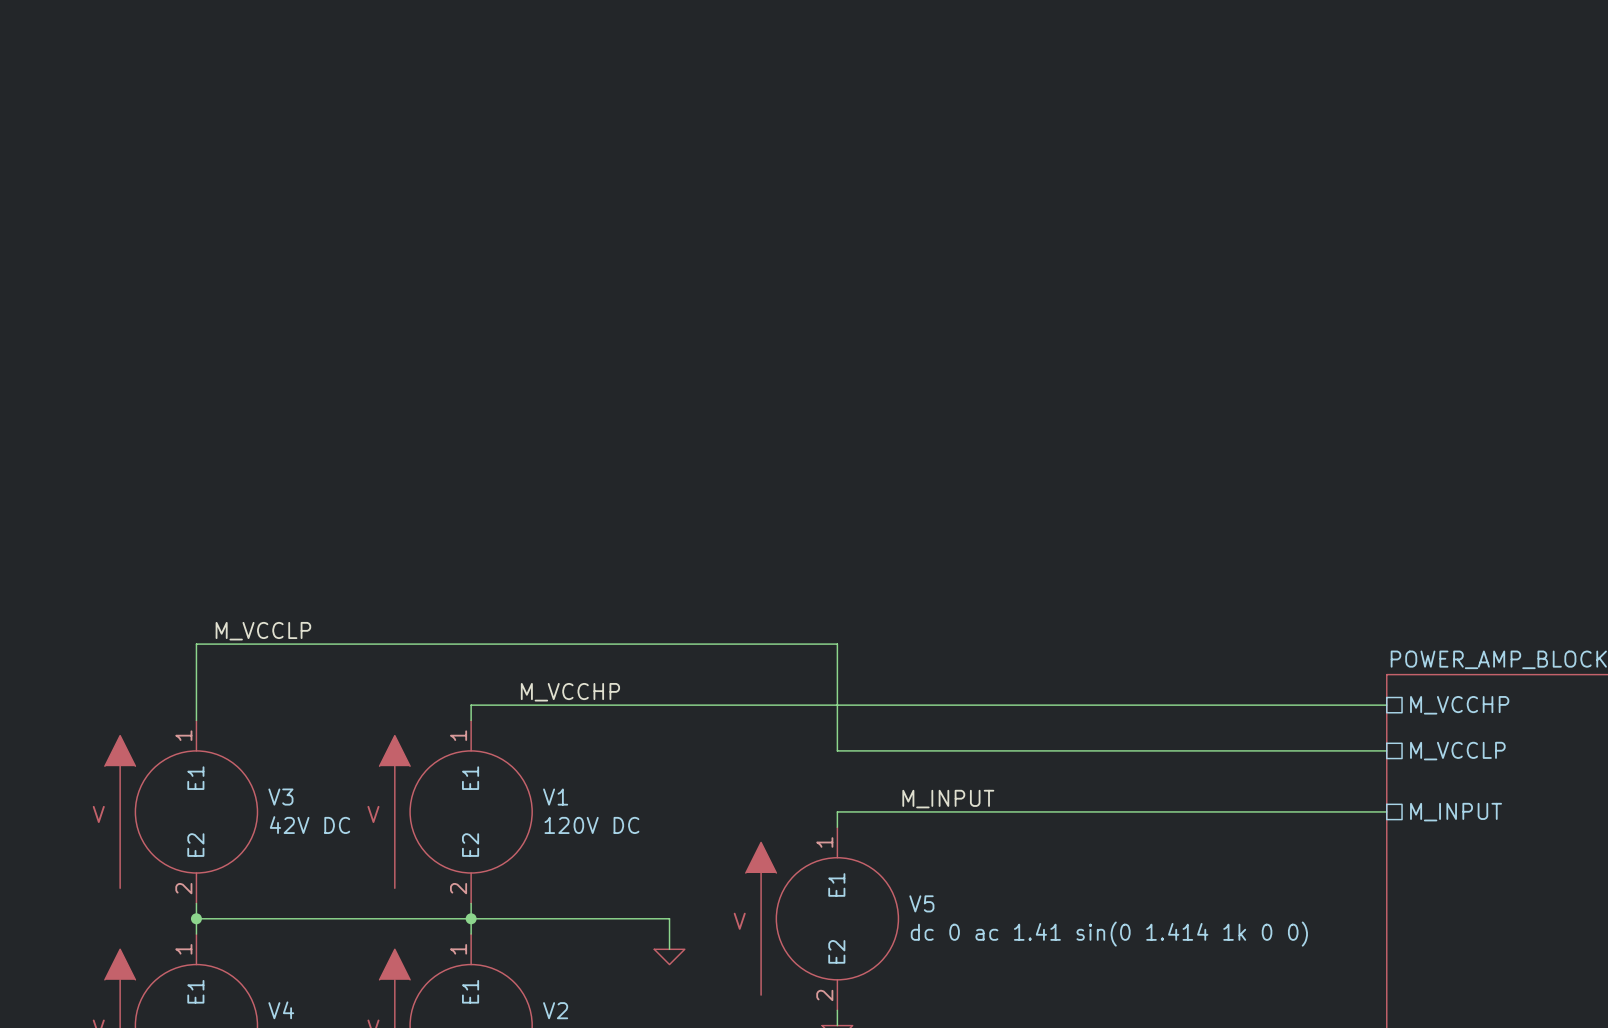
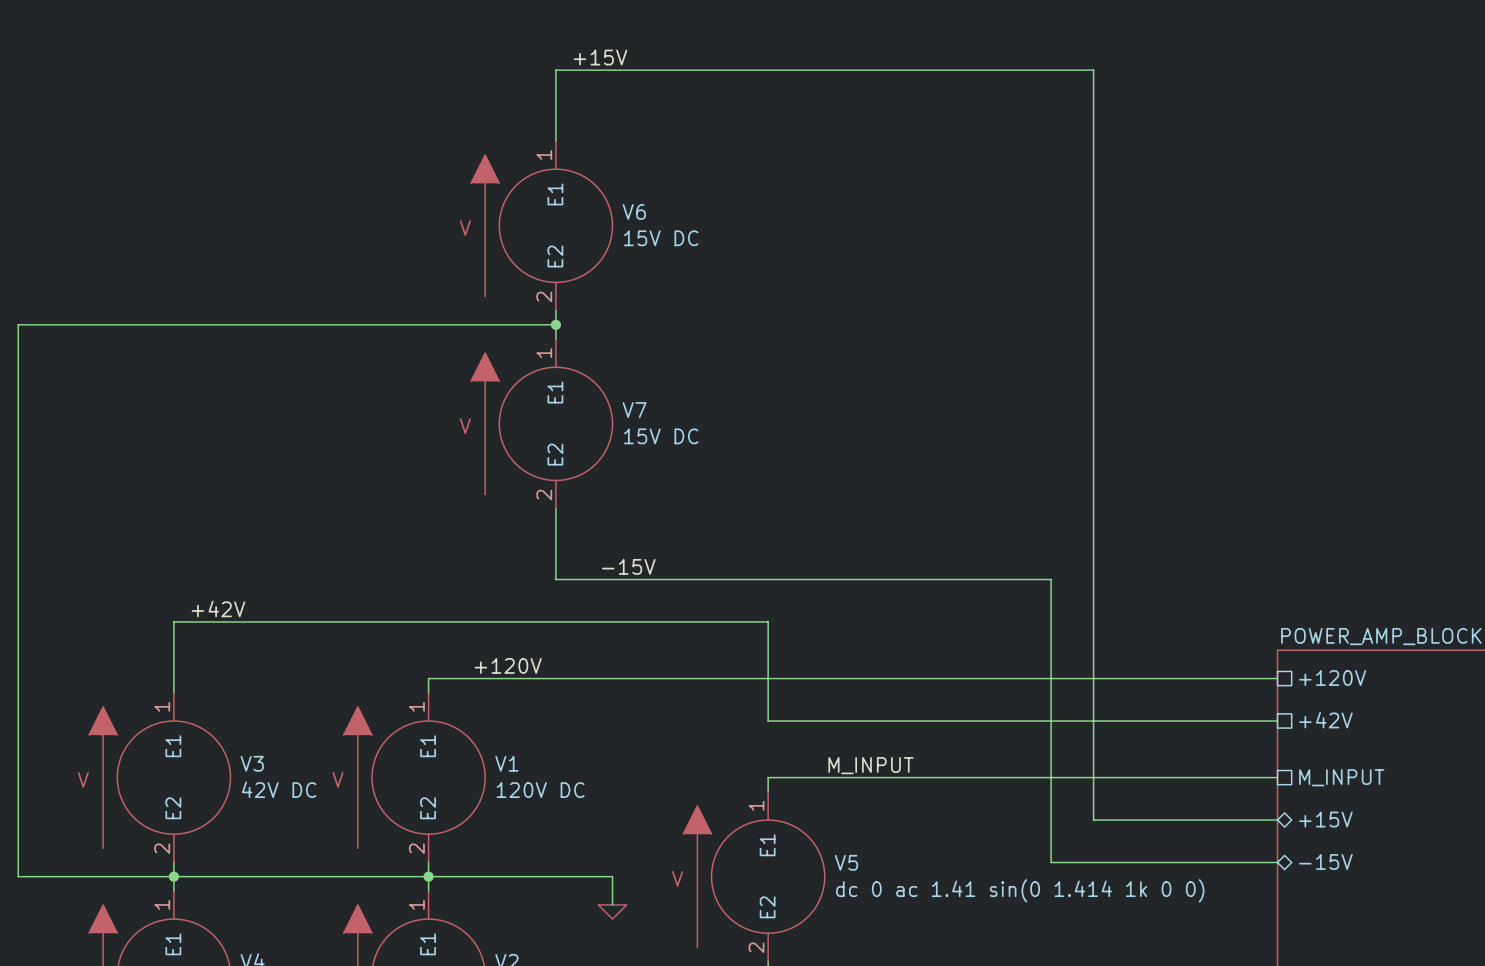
label: none -> +15V (600, 57)
wire: none -> (555, 140) (555, 70) (1093, 70) (1093, 820) (1277, 820)
V6: none -> 15V DC (541, 225)
wire: none -> (555, 310) (555, 338)
wire: none -> (555, 324) (18, 324) (18, 876) (173, 876)
junction: none -> (555, 324)
V7: none -> 15V DC (541, 423)
wire: none -> (555, 508) (555, 579) (1051, 579) (1051, 862) (1277, 862)
label: none -> -15V (628, 566)
label: M_VCCLP (263, 631) -> +42V (218, 609)
label: M_VCCHP (570, 692) -> +120V (508, 665)
sheet pin: M_VCCHP (1459, 705) -> +120V (1332, 678)
sheet pin: M_VCCLP (1457, 751) -> +42V (1325, 720)
sheet pin: none -> +15V (1325, 819)
sheet pin: none -> -15V (1325, 861)

